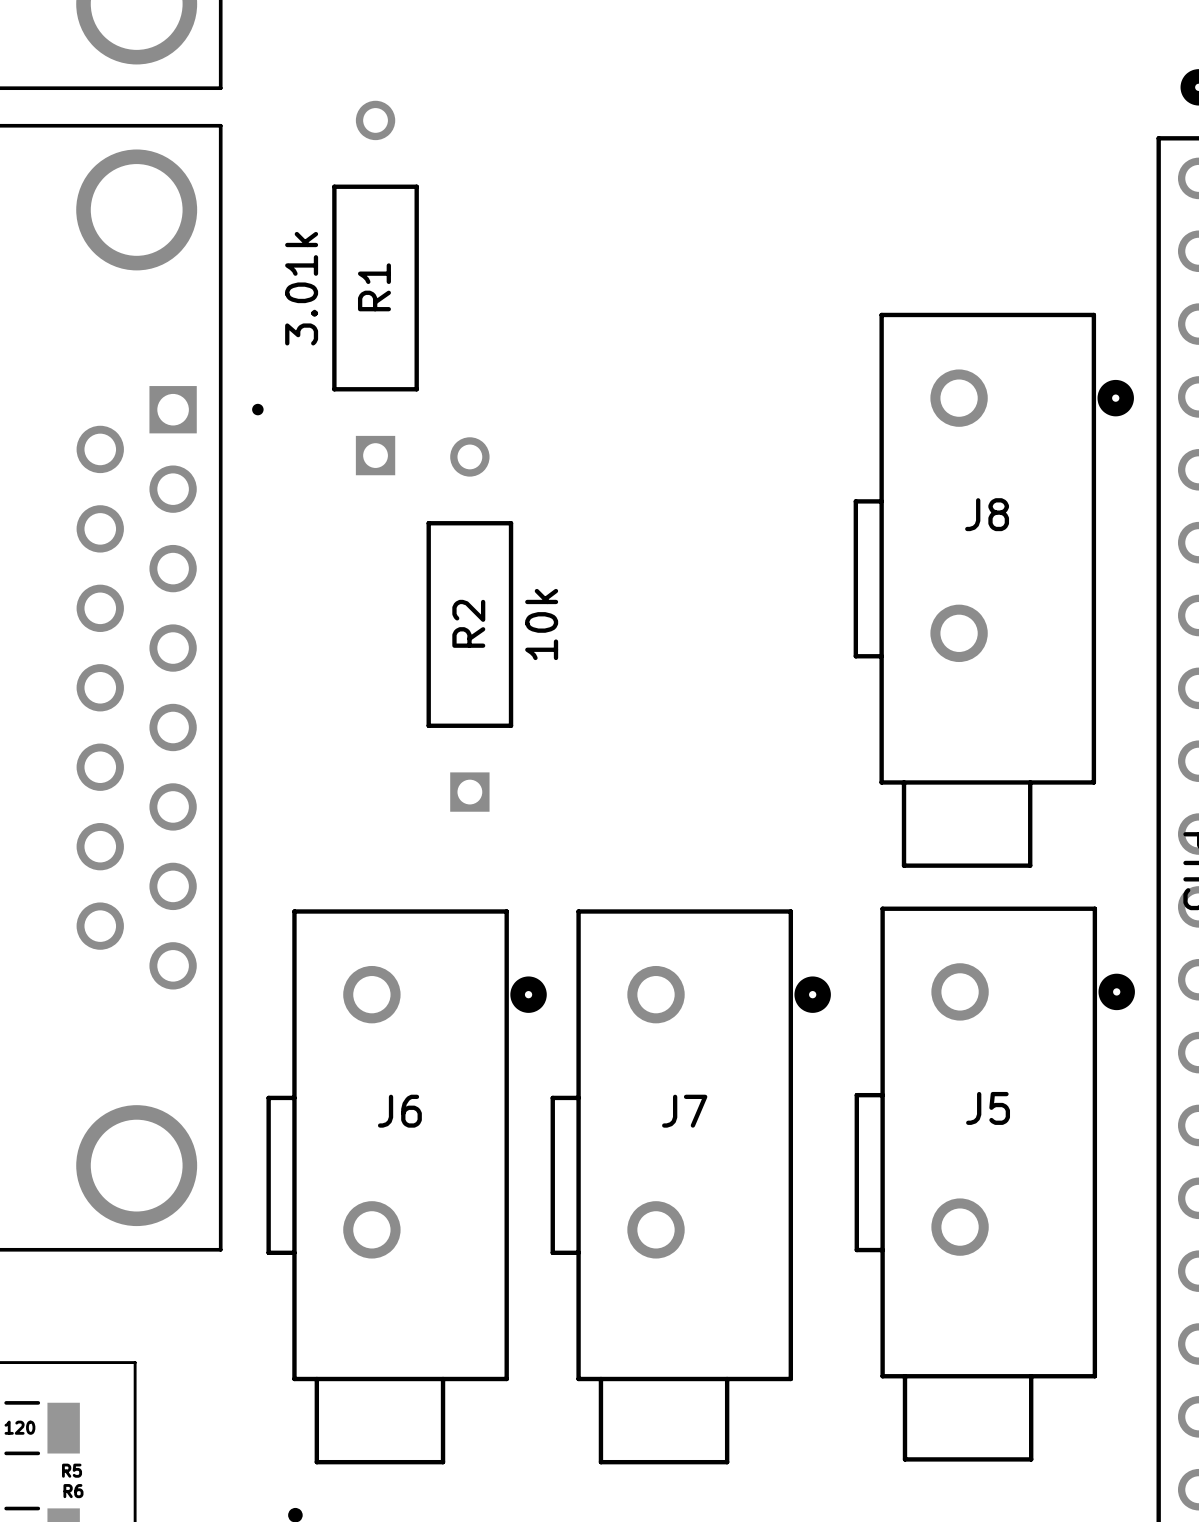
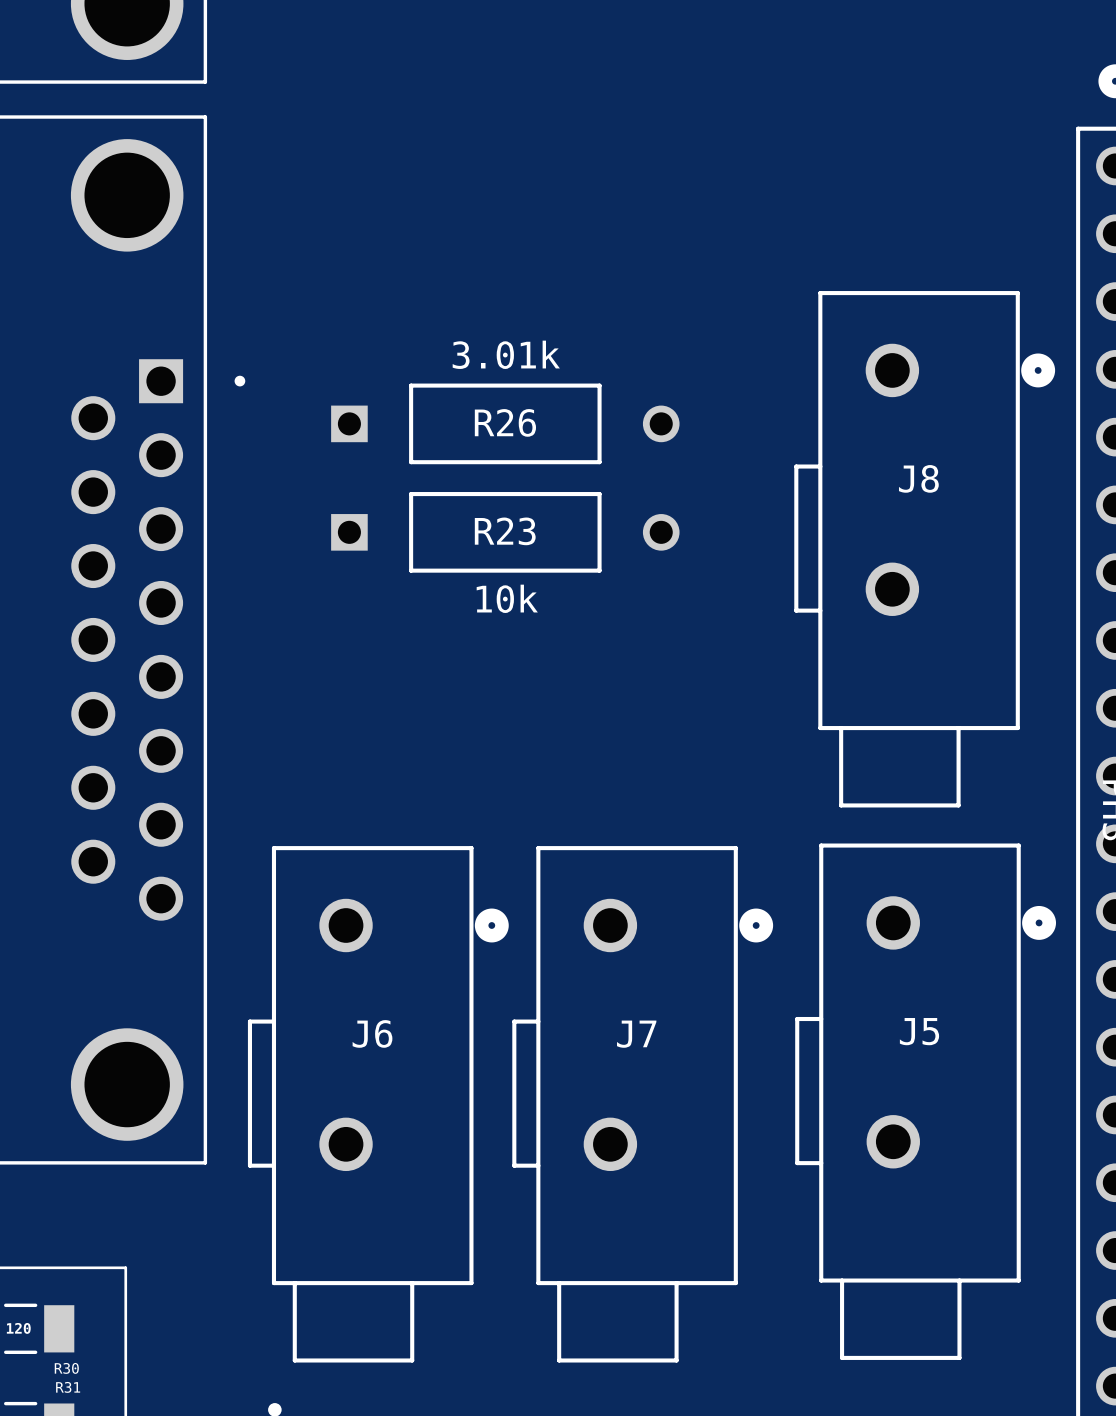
R1: 3.01k (375, 288) -> none
R26: none -> 3.01k (505, 423)
R23: none -> 10k (505, 532)
R2: 10k (469, 624) -> none
R5 name: R5 (72, 1470) -> R30 (66, 1368)
R6 name: R6 (73, 1491) -> R31 (68, 1387)

